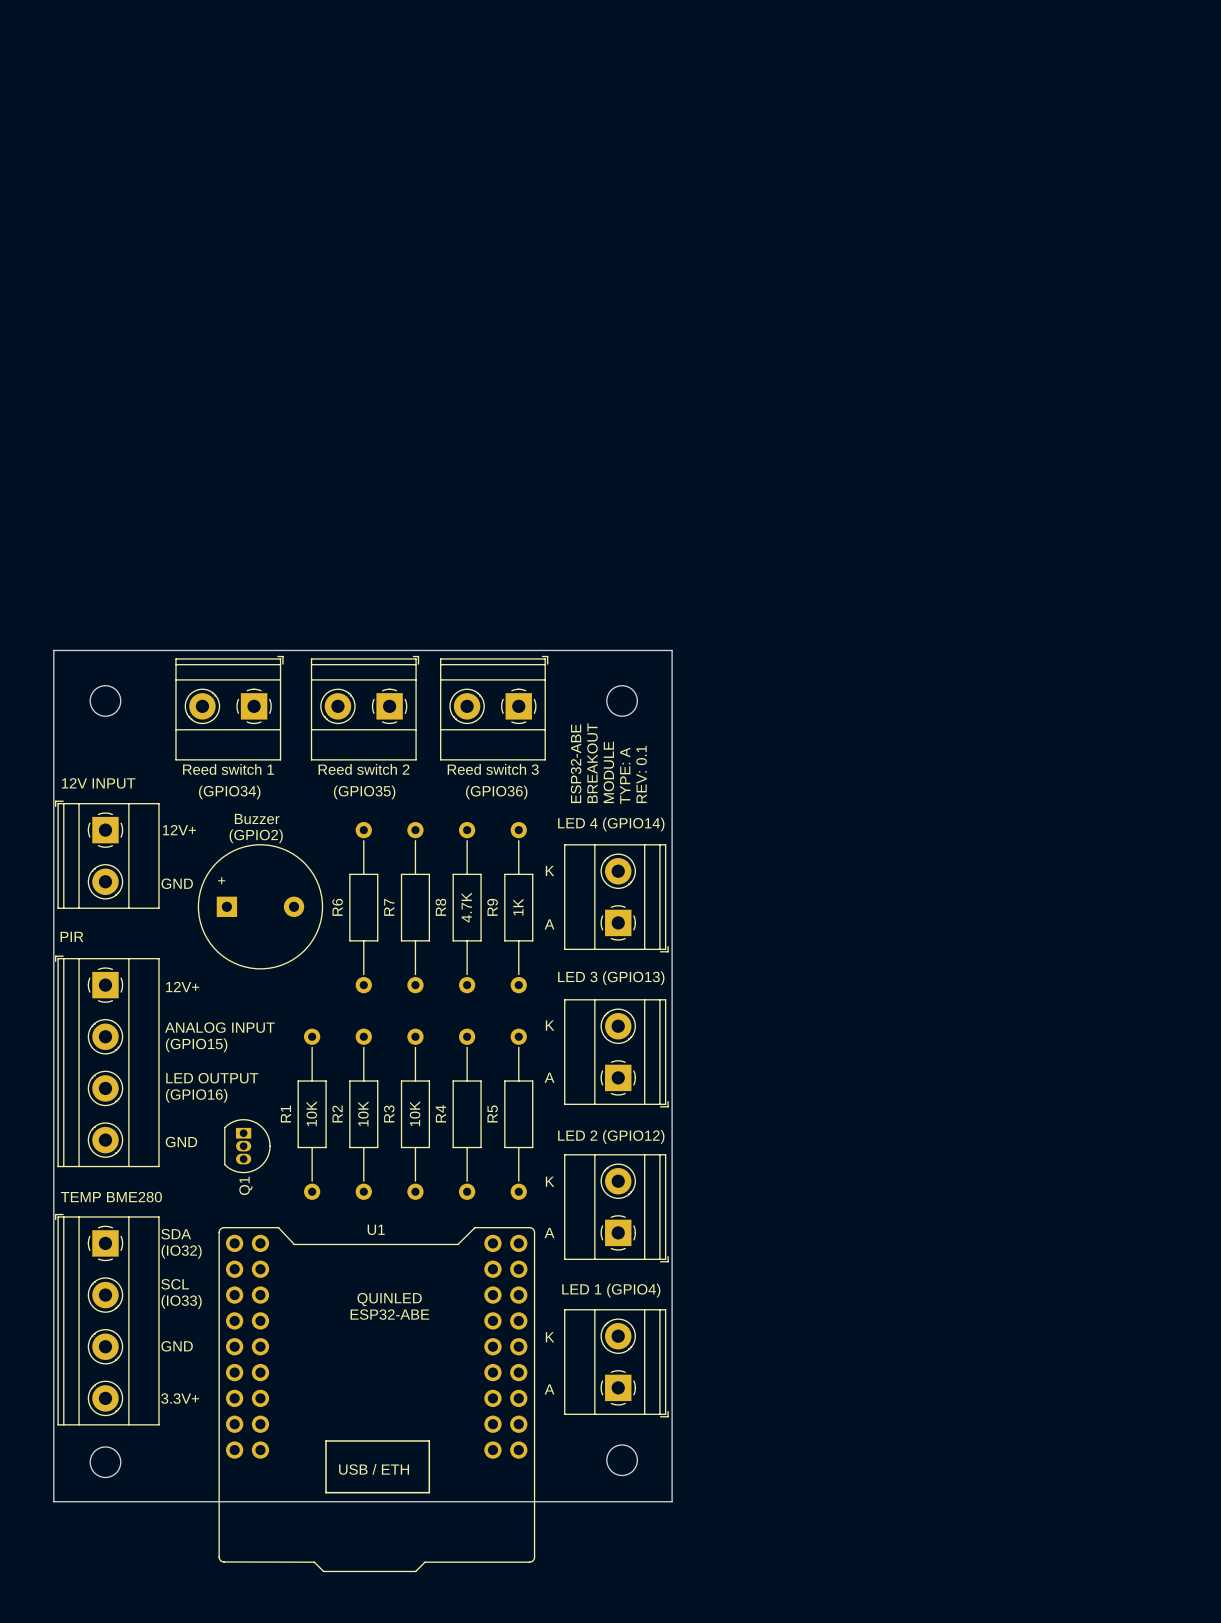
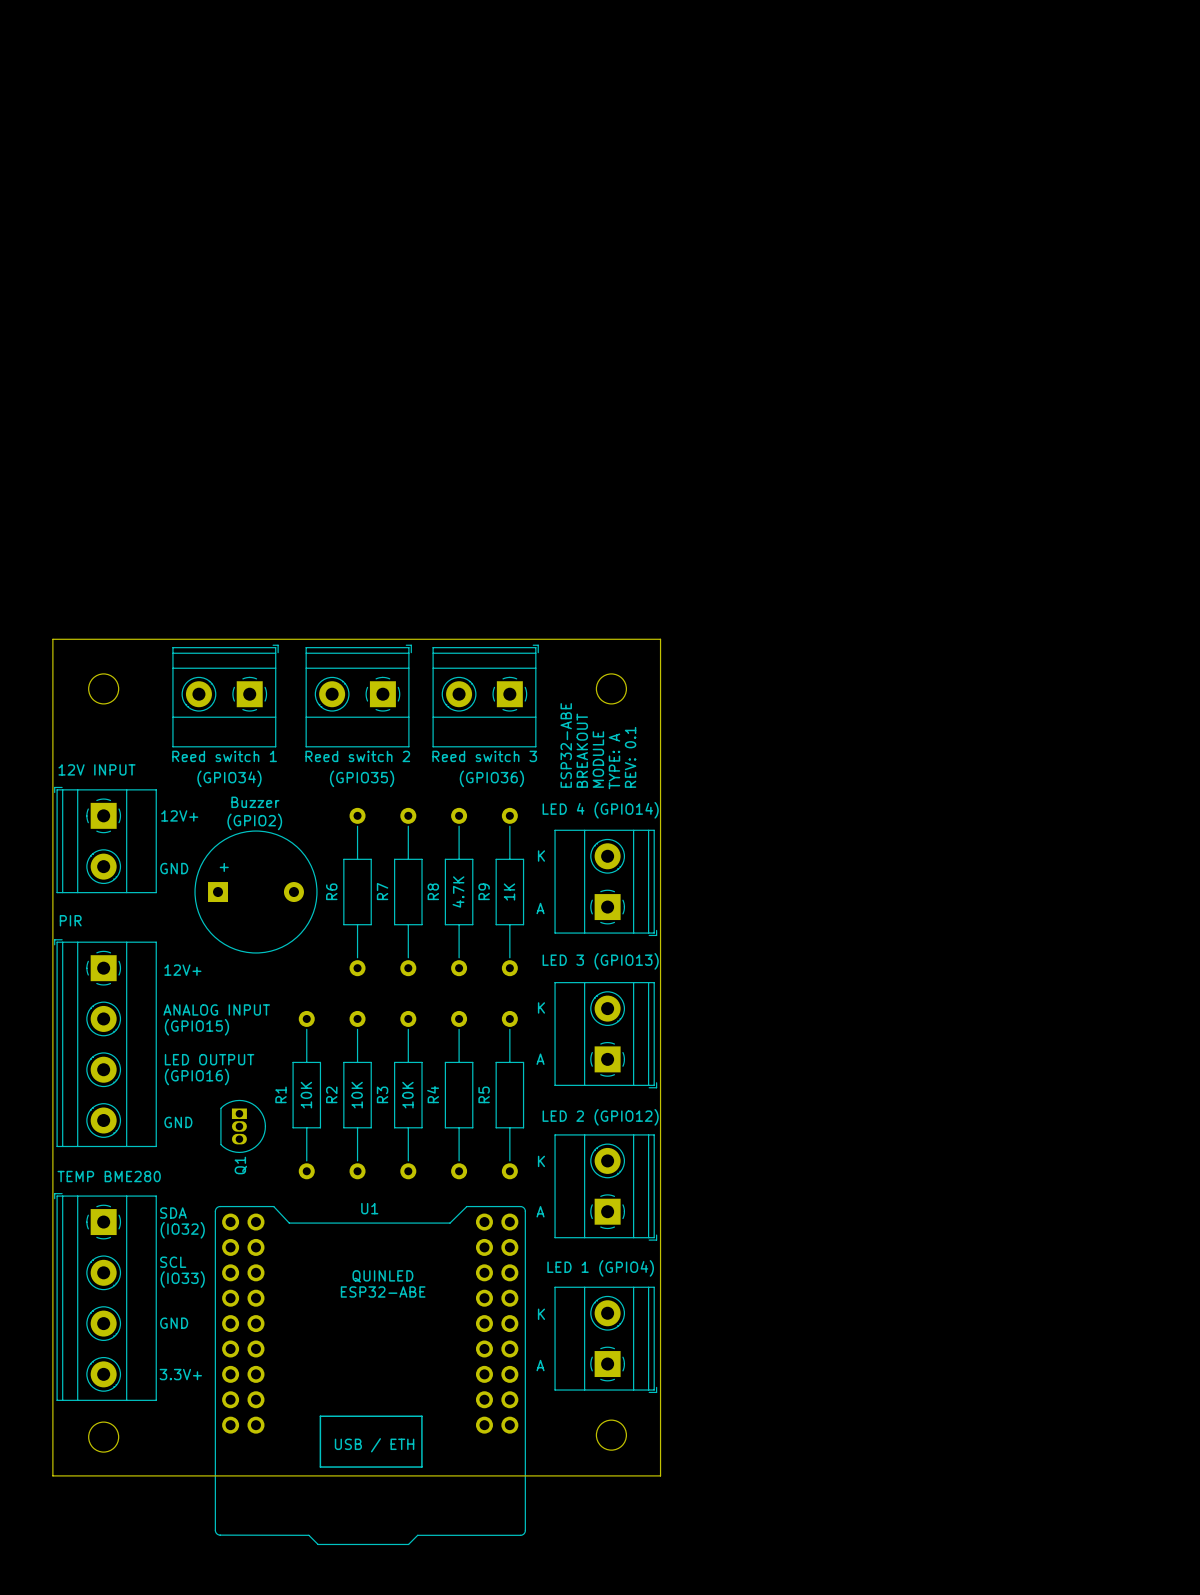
Buzzer: (260, 906) -> none
part: none -> Buzzer (255, 892)

